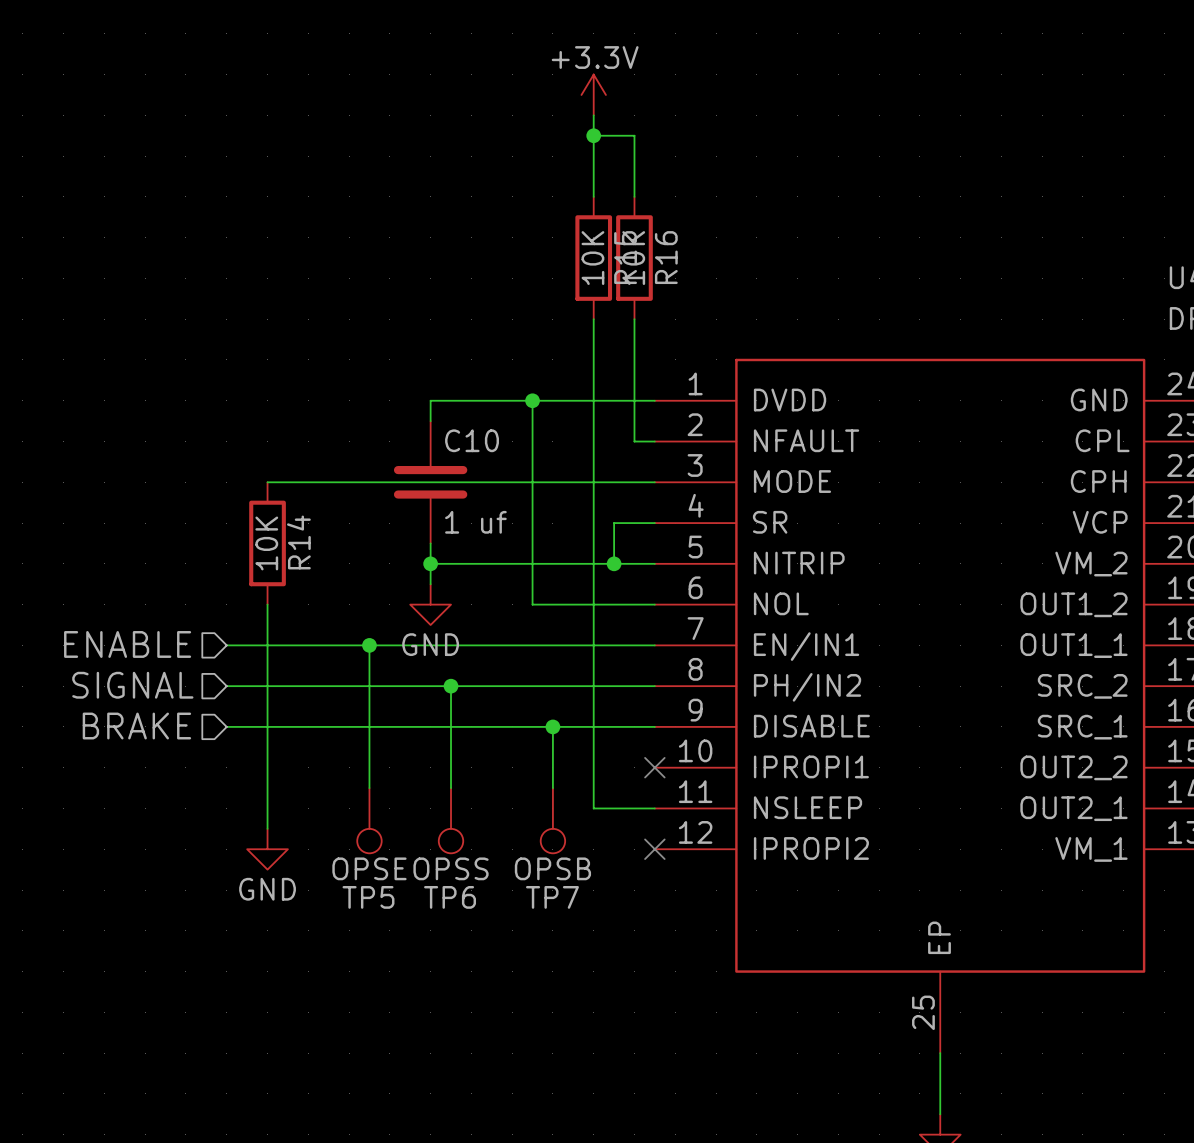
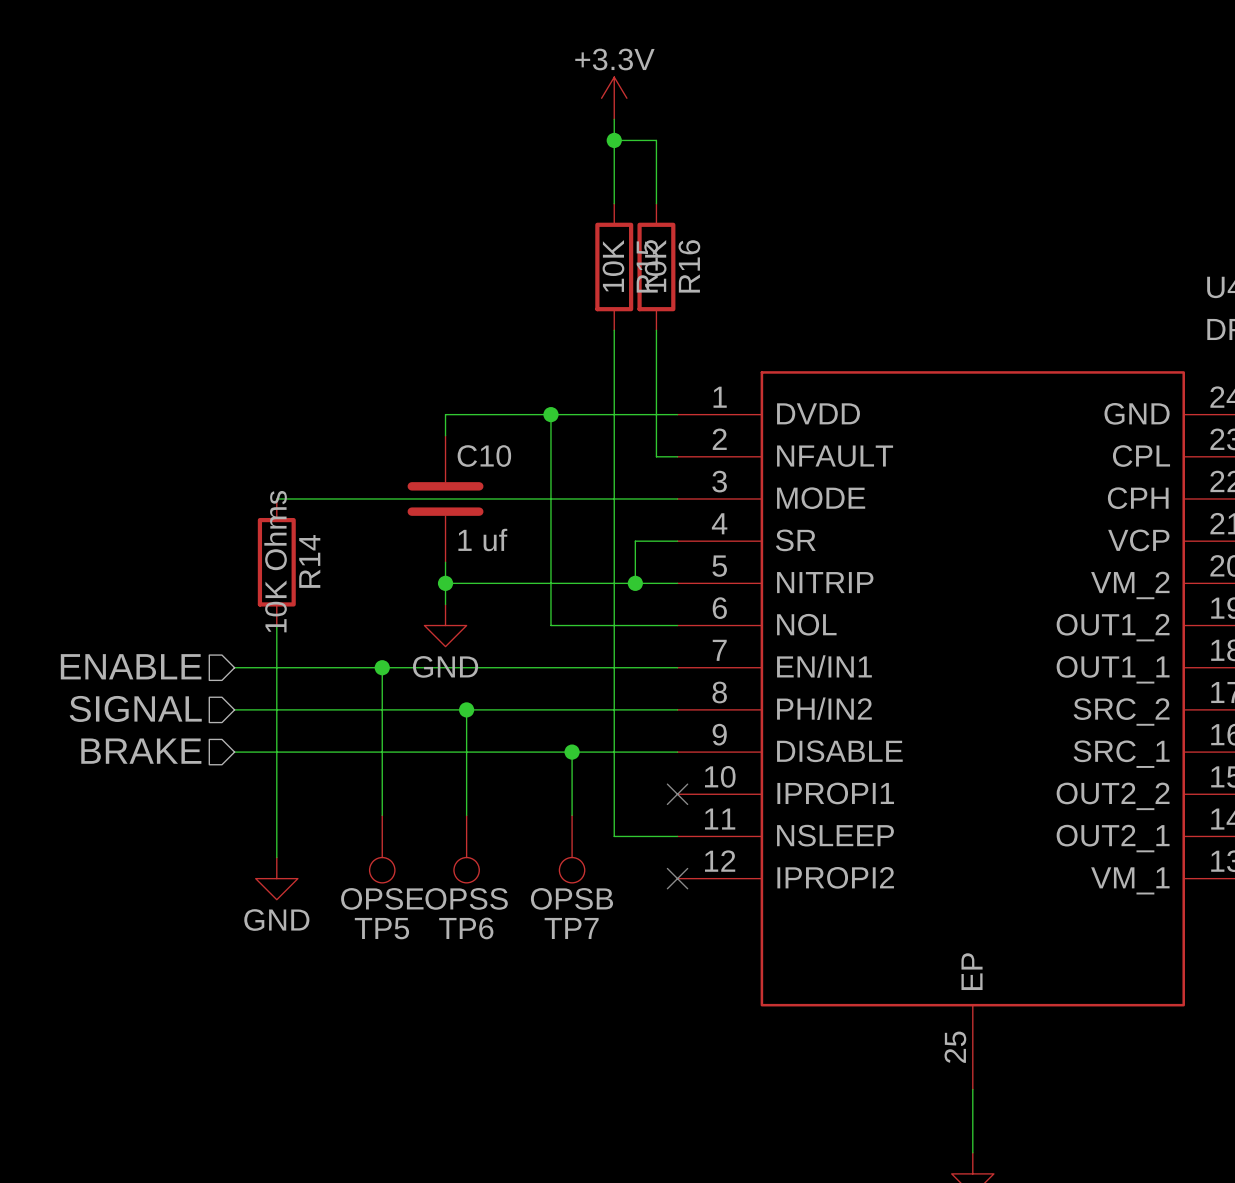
R14 value: 10K (266, 543) -> 10K Ohms (275, 561)

